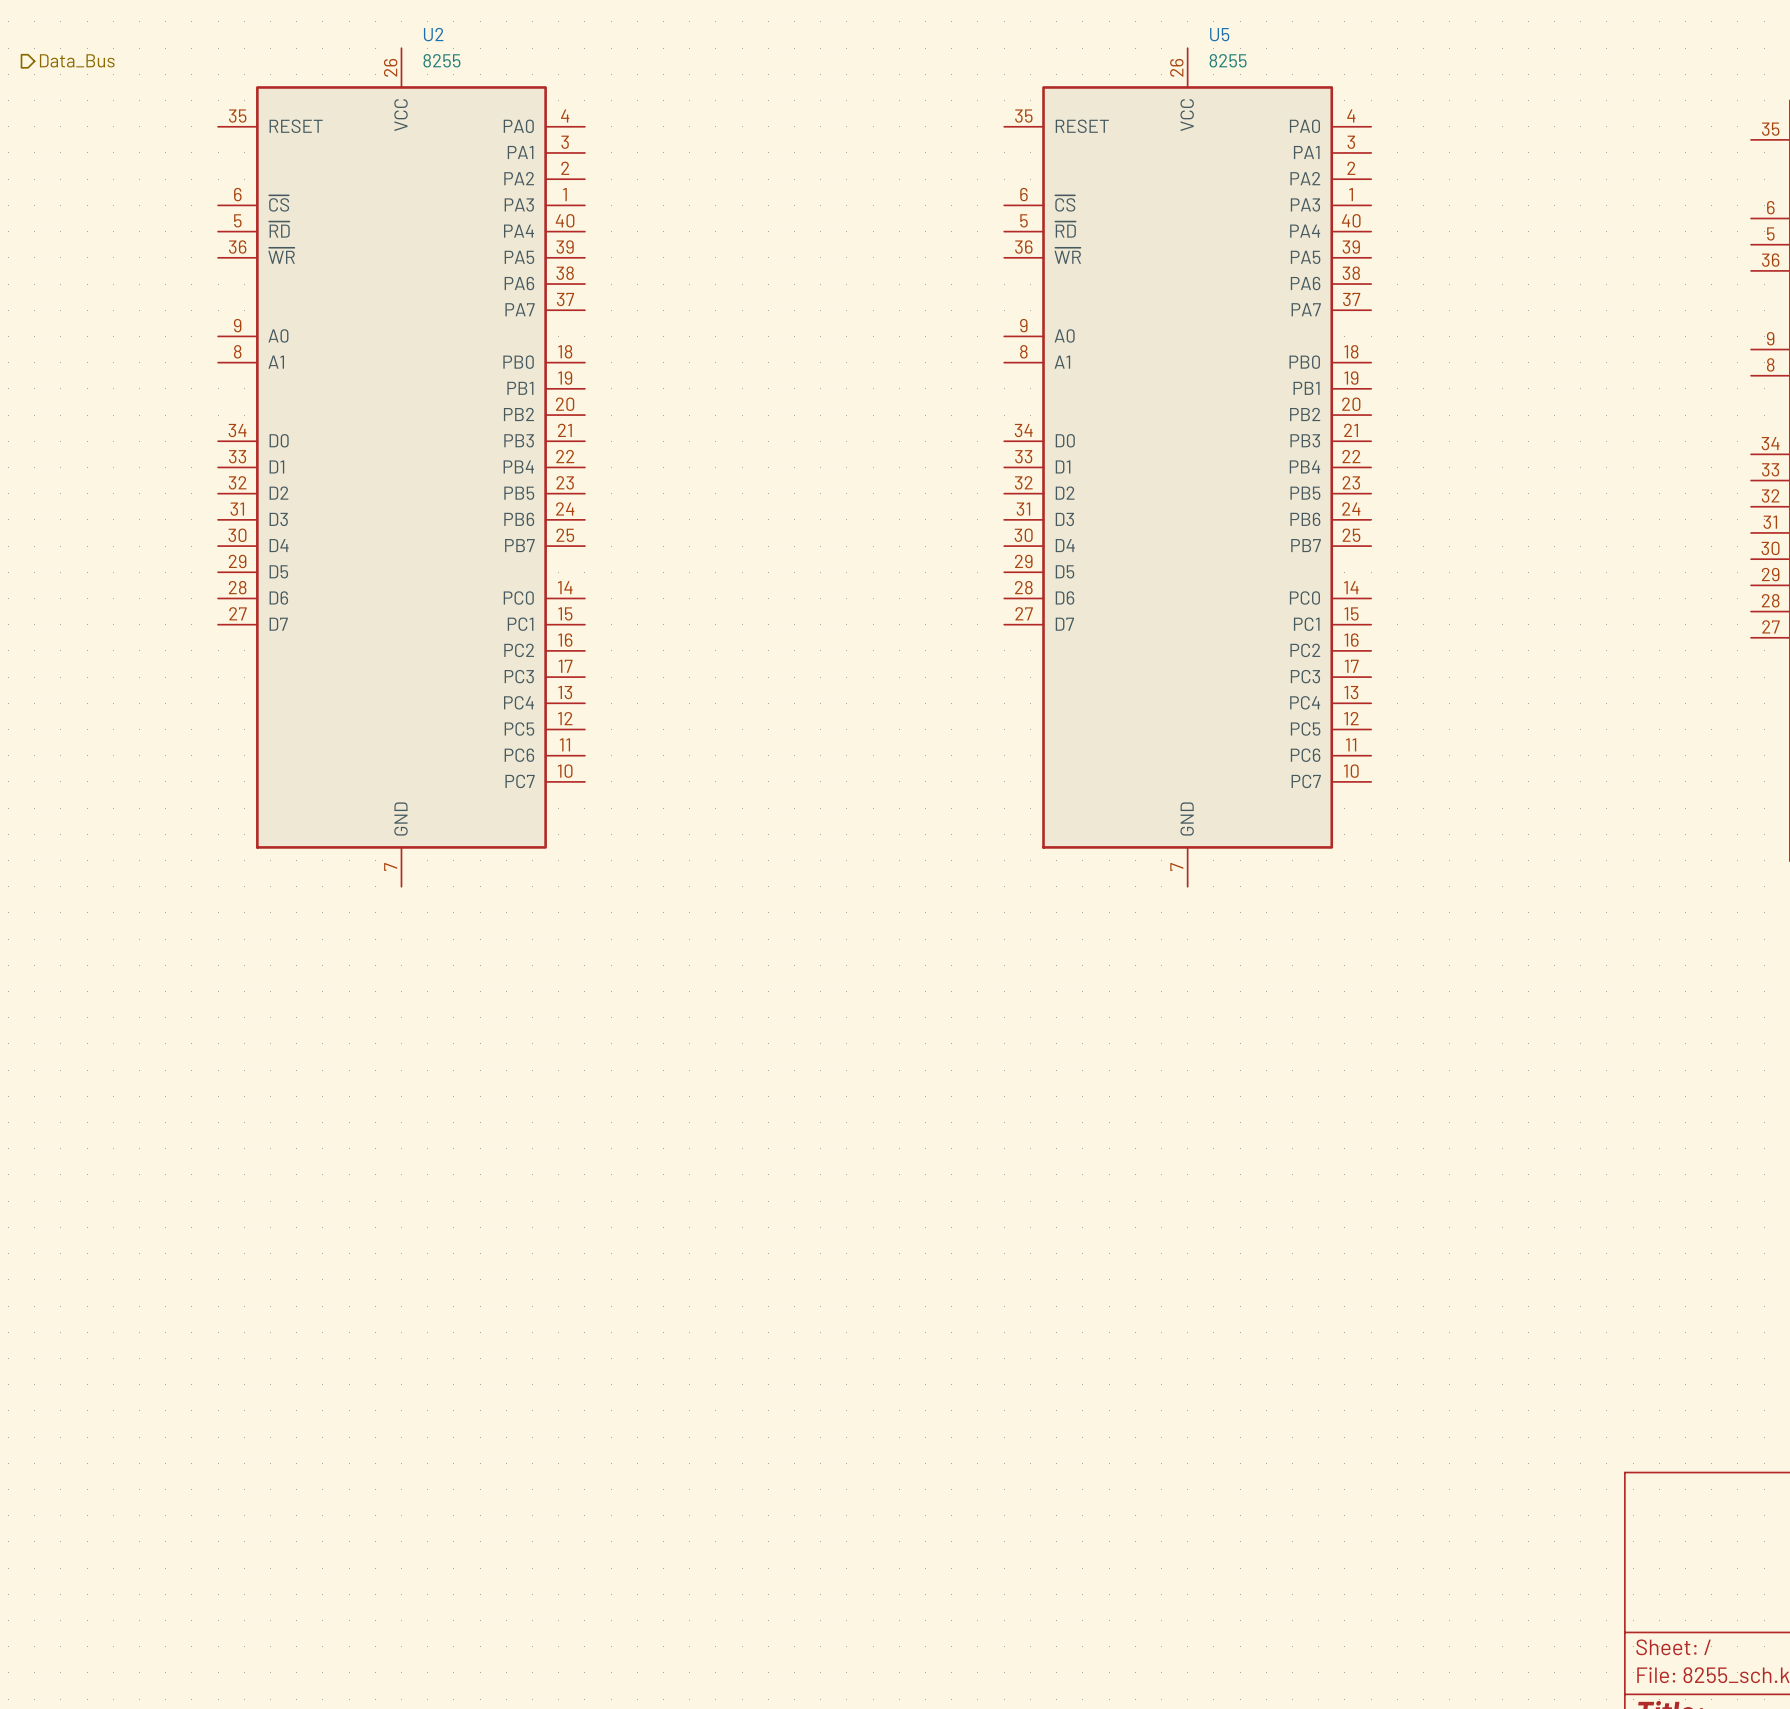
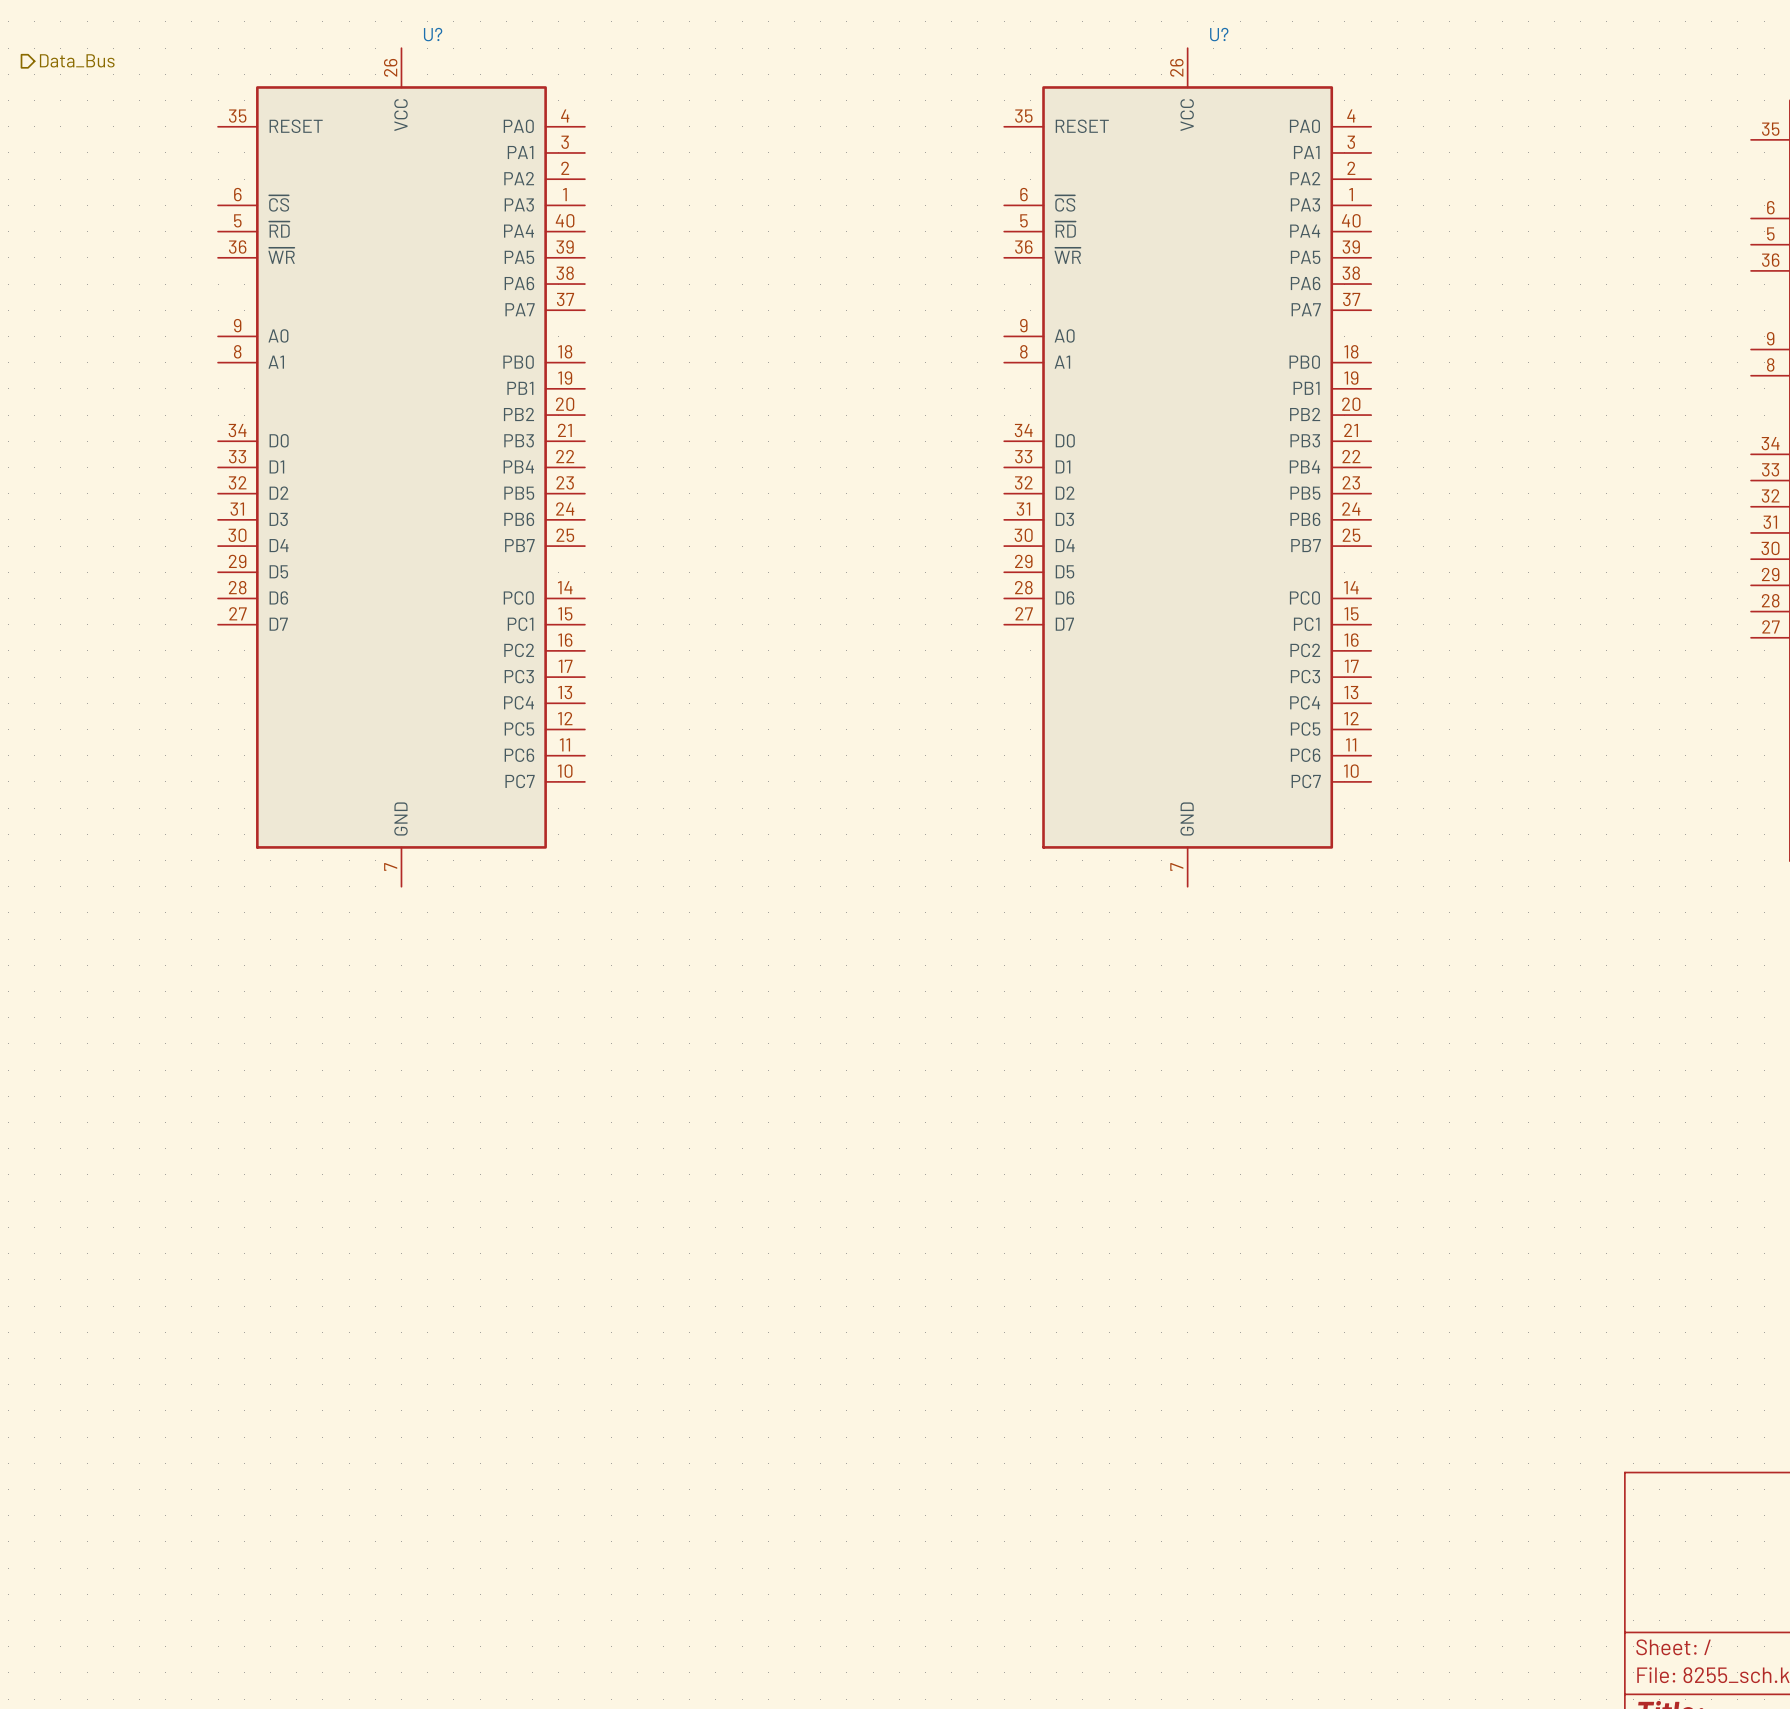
U2 name: U2 (433, 34) -> U? (433, 34)
U5 name: U5 (1219, 34) -> U? (1219, 34)
U2 value: 8255 (441, 60) -> none
U5 value: 8255 (1228, 60) -> none

